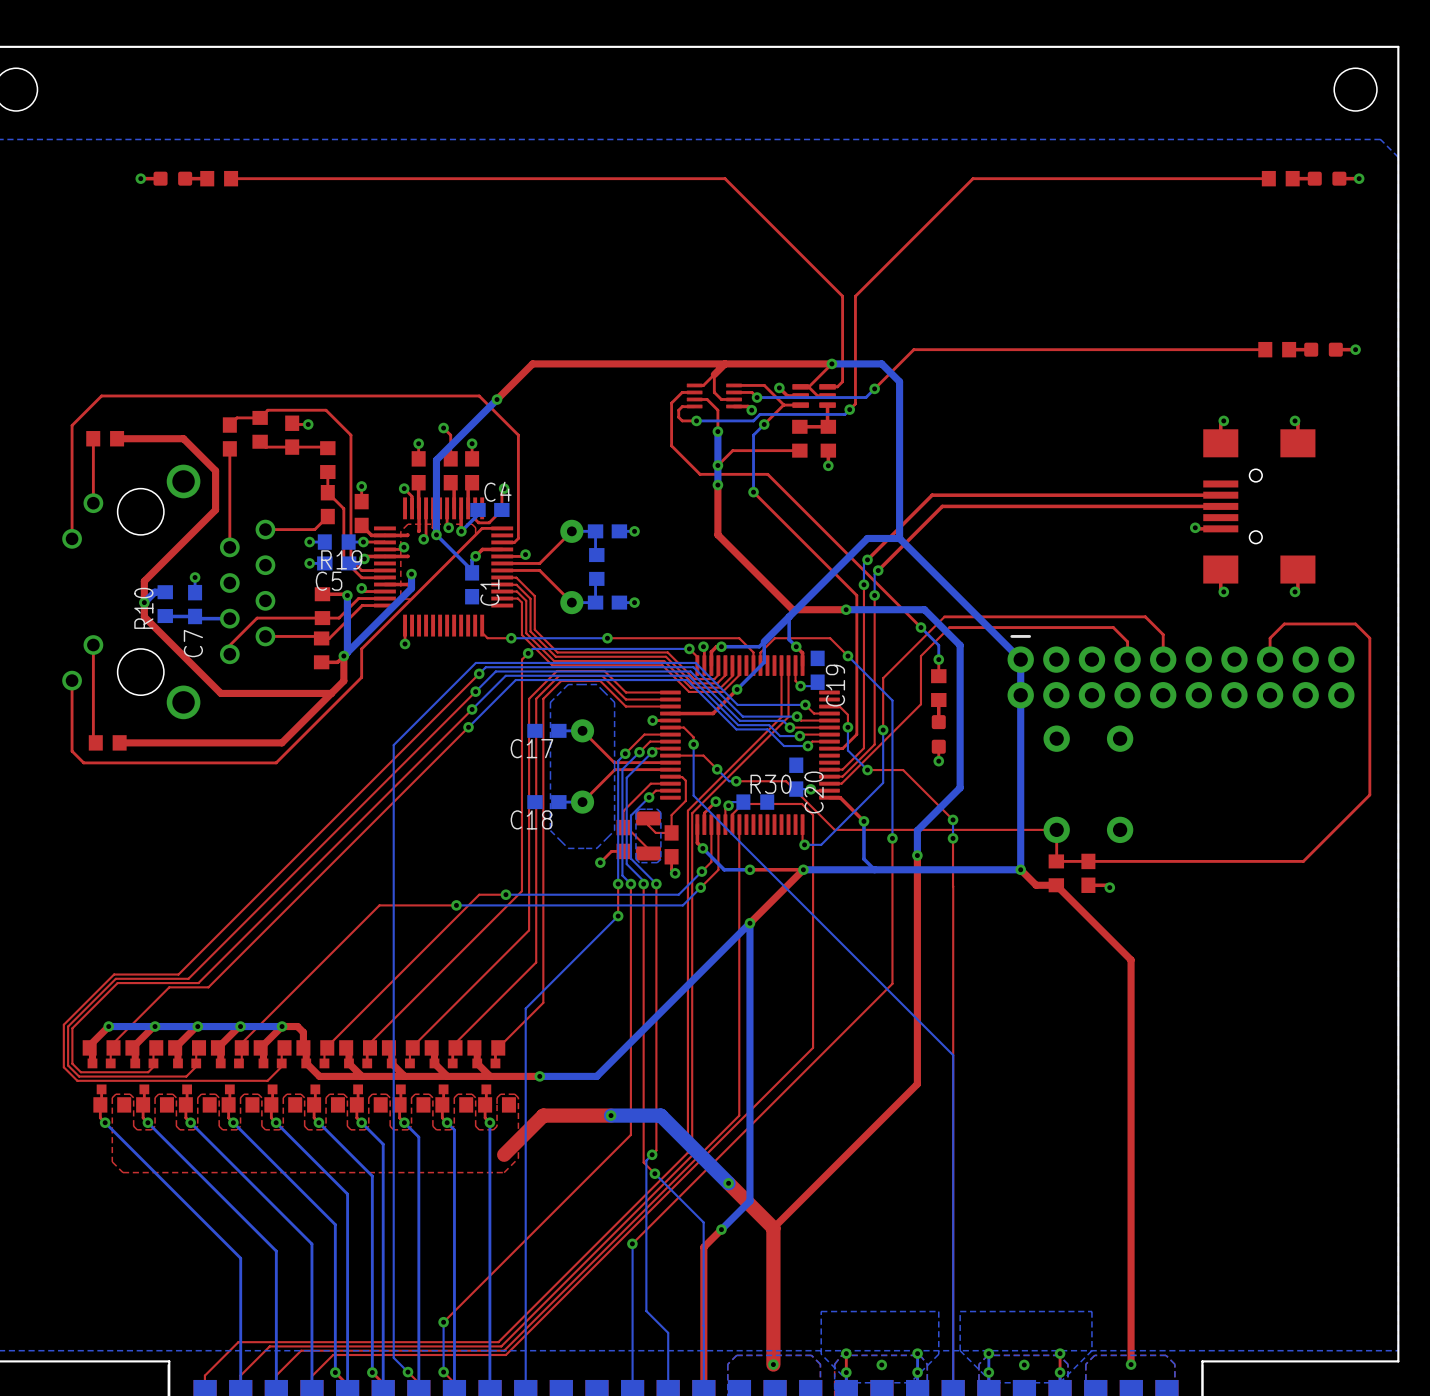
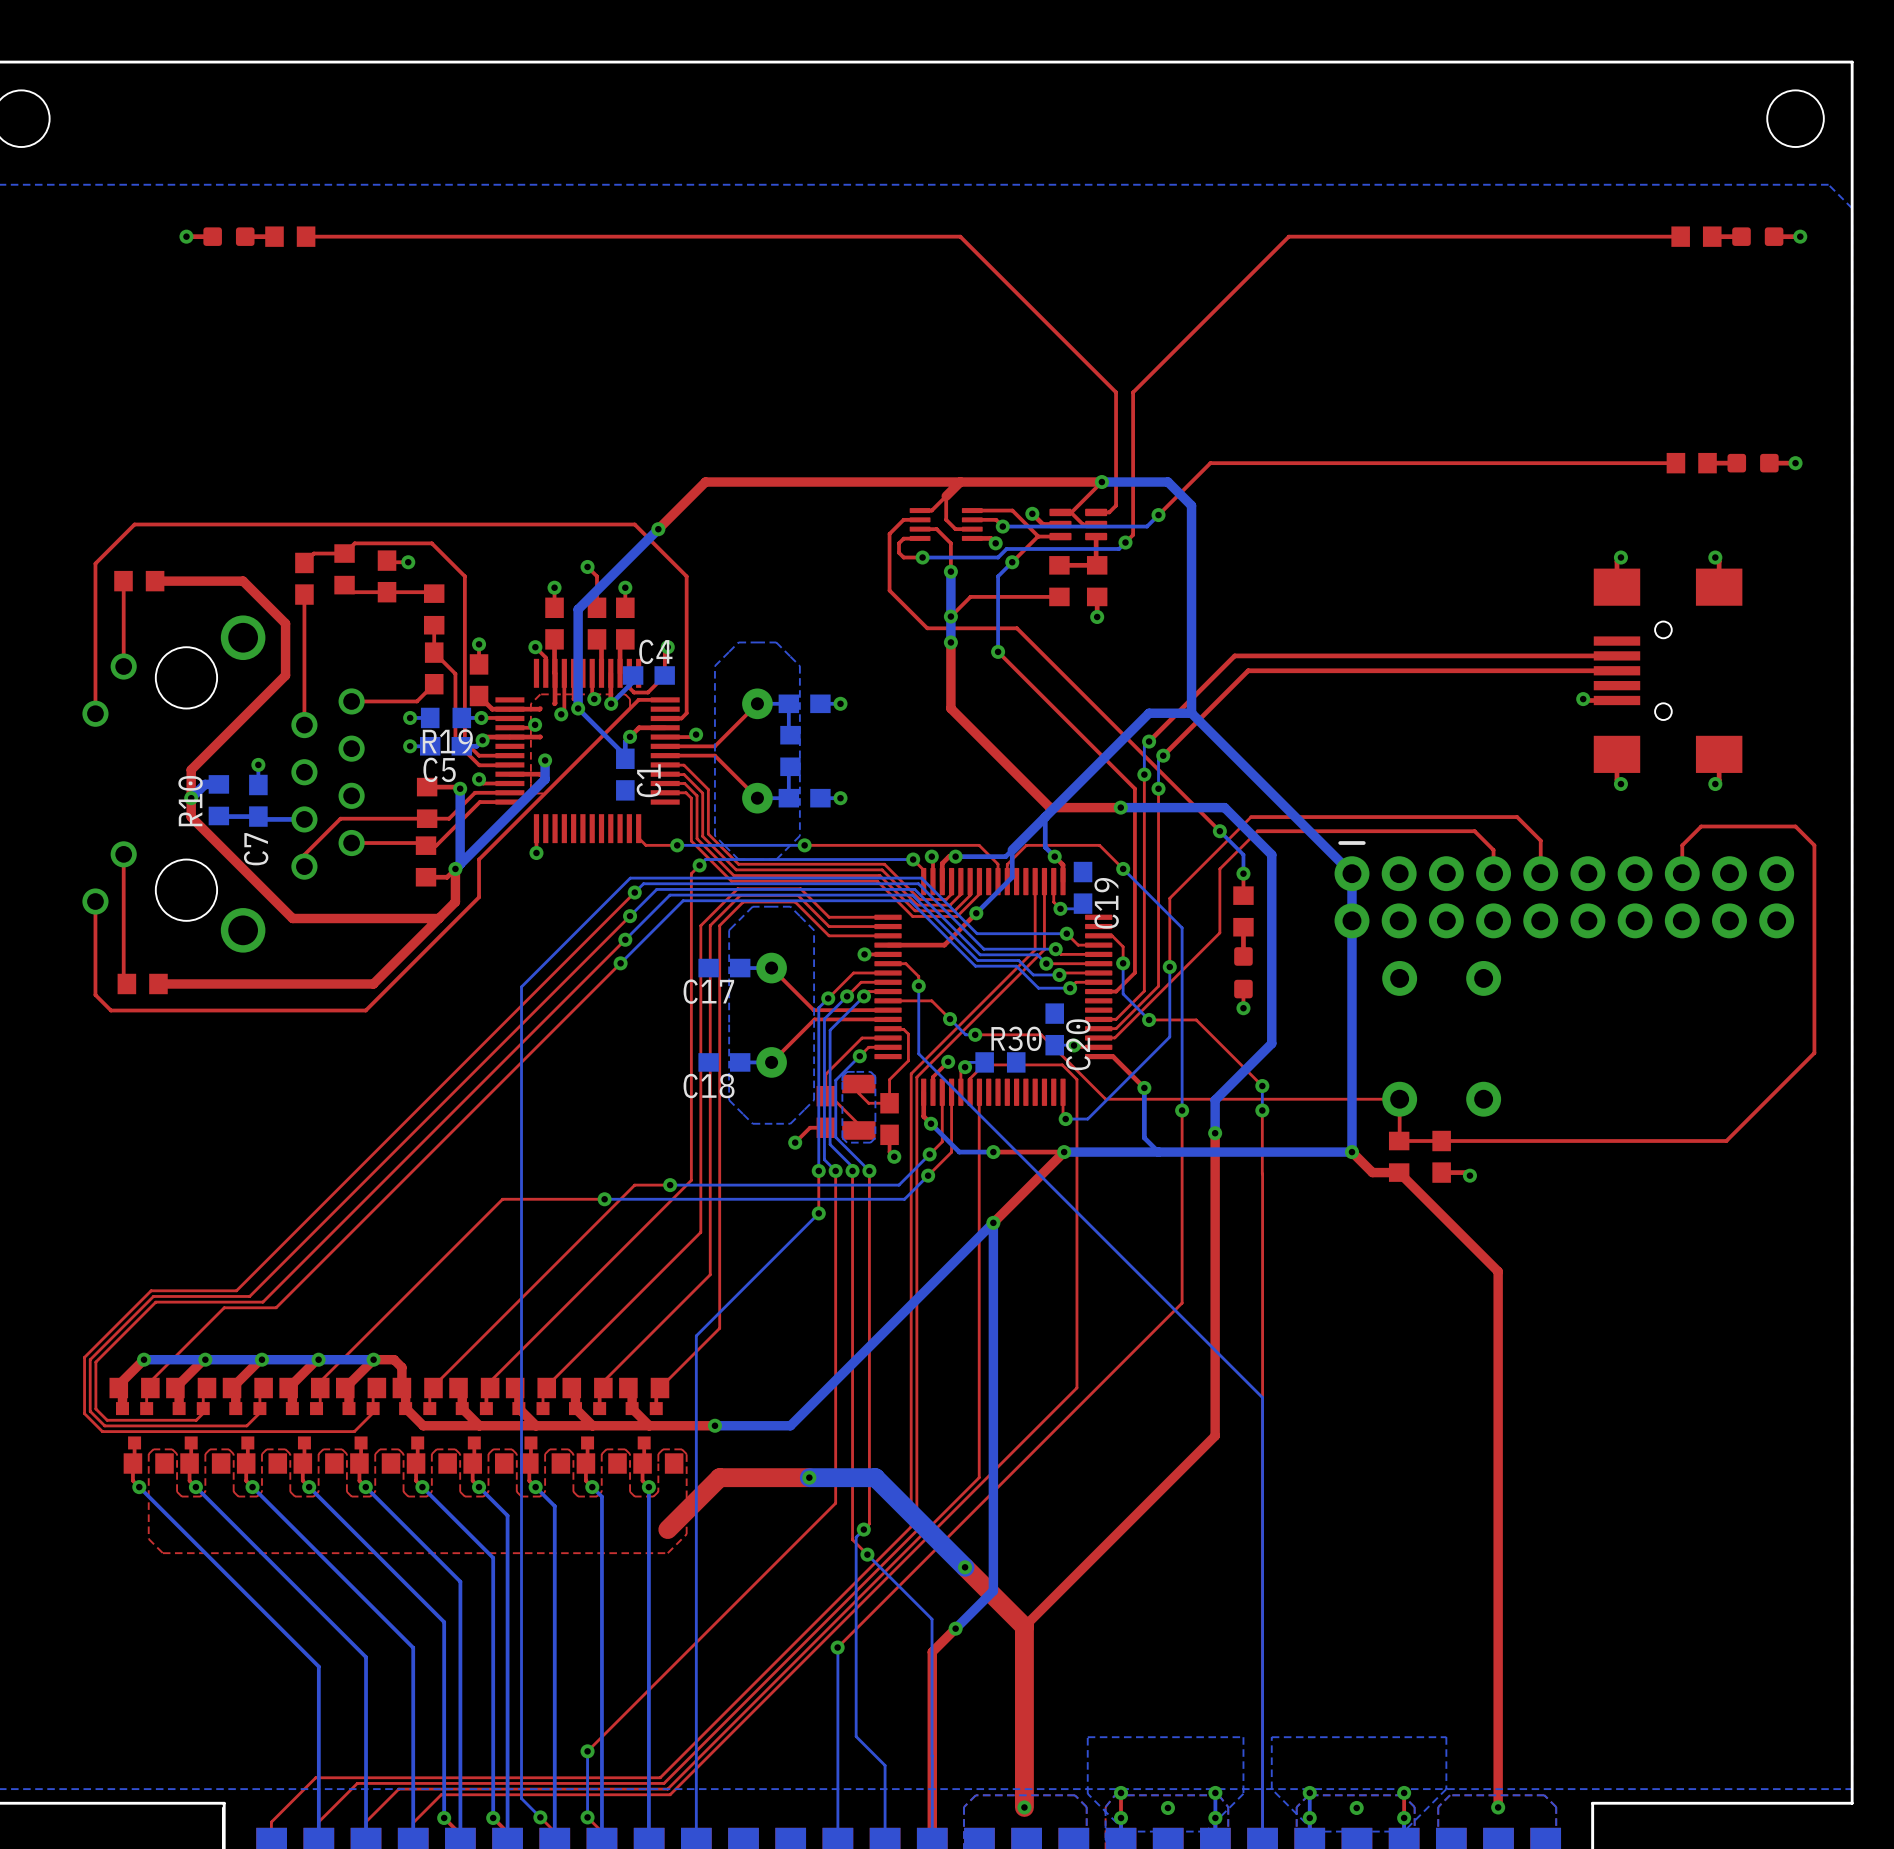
bottom zone outline: none -> (776, 642) (738, 642) (714, 666) (714, 835) (738, 859) (776, 859) (799, 835) (799, 666) (776, 642)

